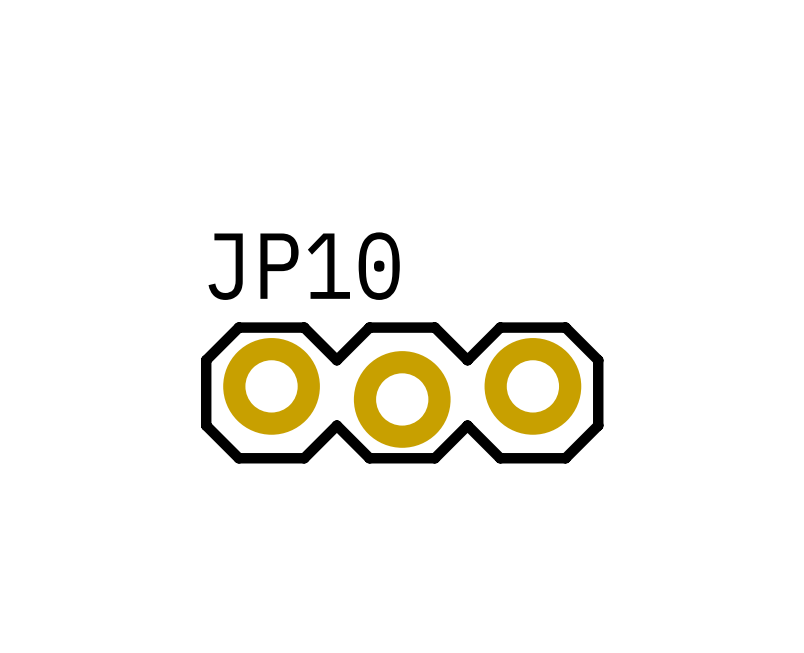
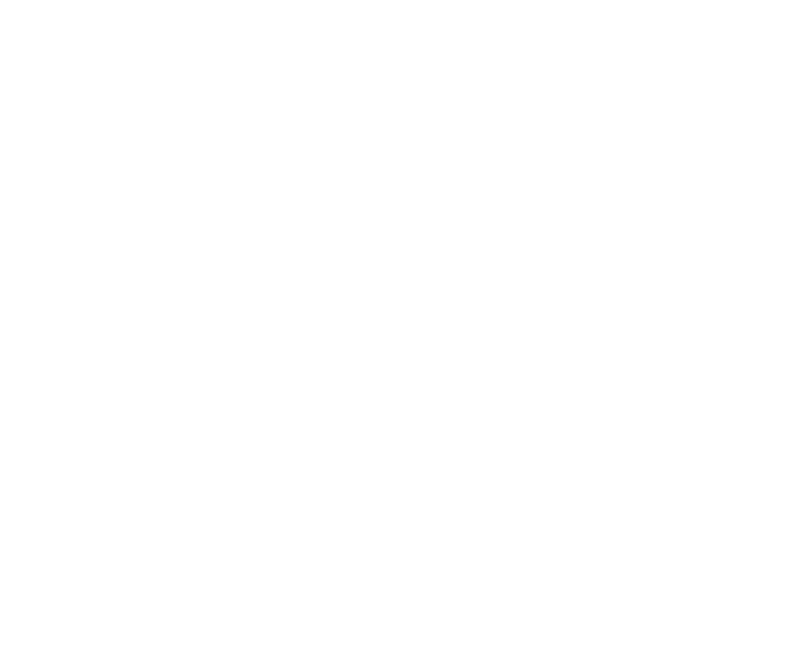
JP10: (402, 392) -> none

